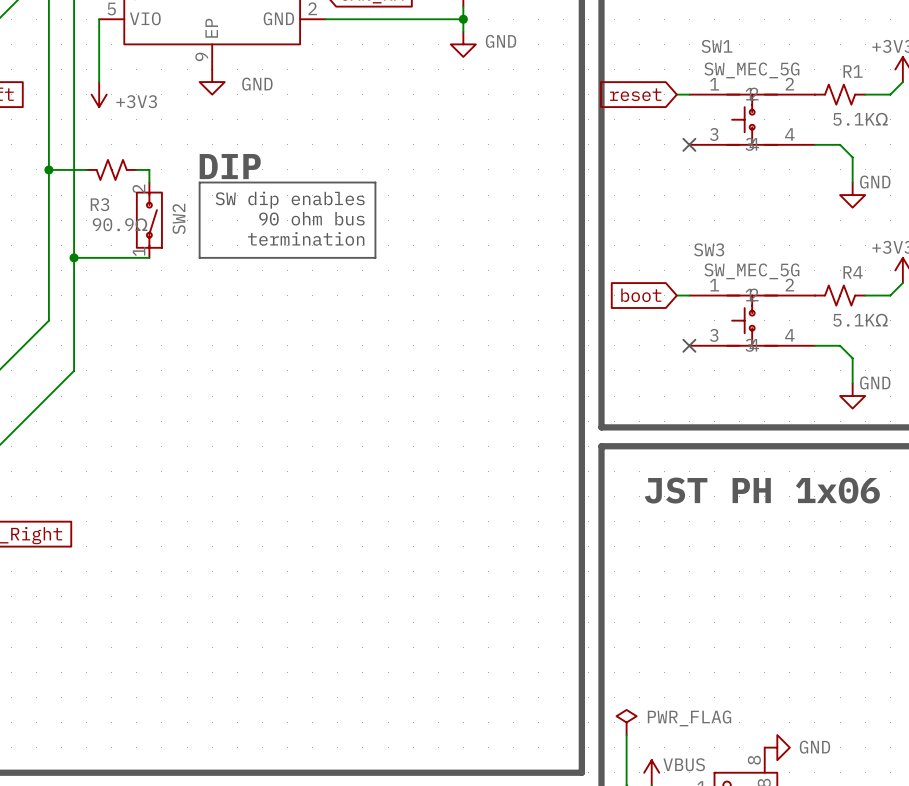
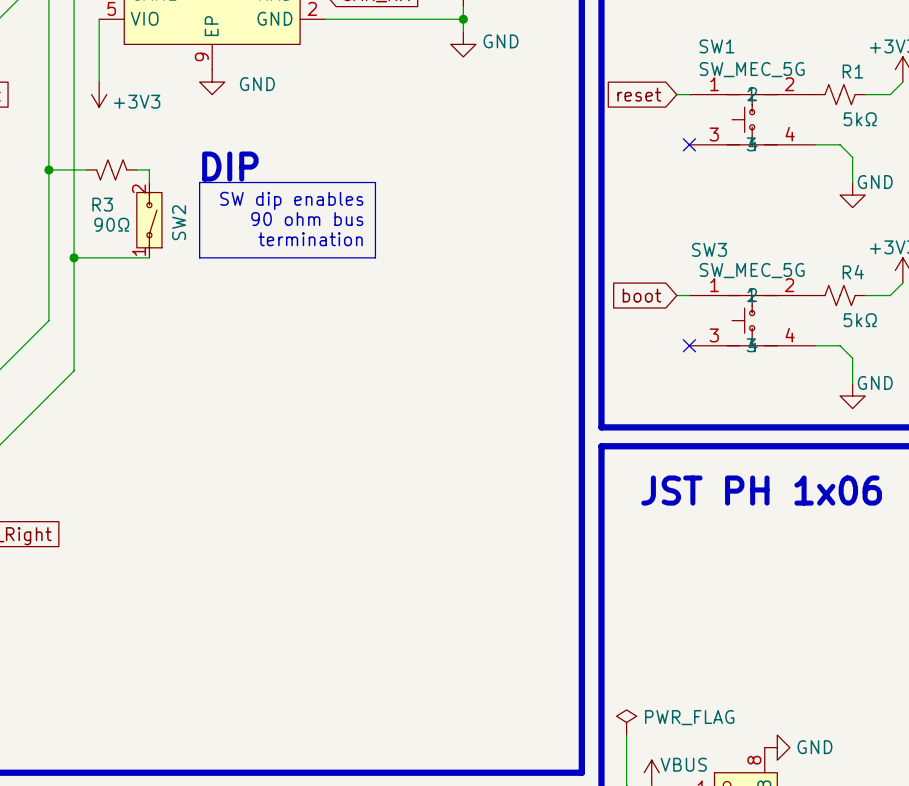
R1 value: 5.1KΩ (860, 119) -> 5kΩ (860, 119)
R3 value: 90.9Ω (120, 224) -> 90Ω (111, 224)
R4 value: 5.1KΩ (860, 320) -> 5kΩ (860, 320)

